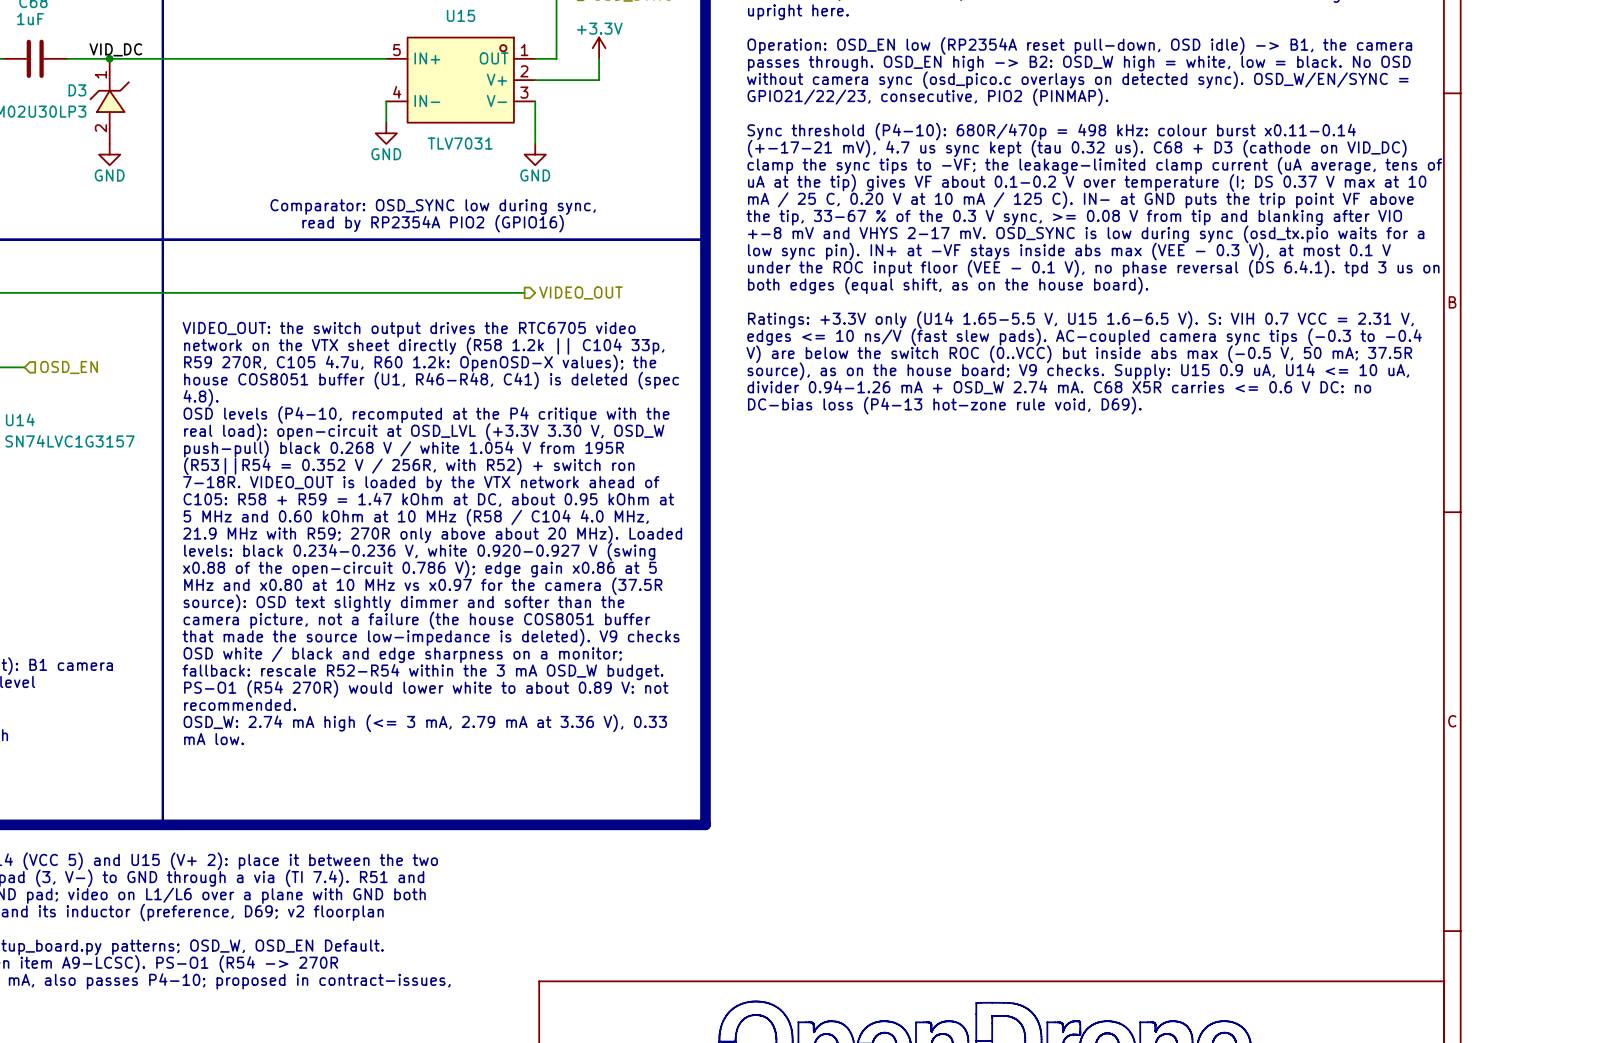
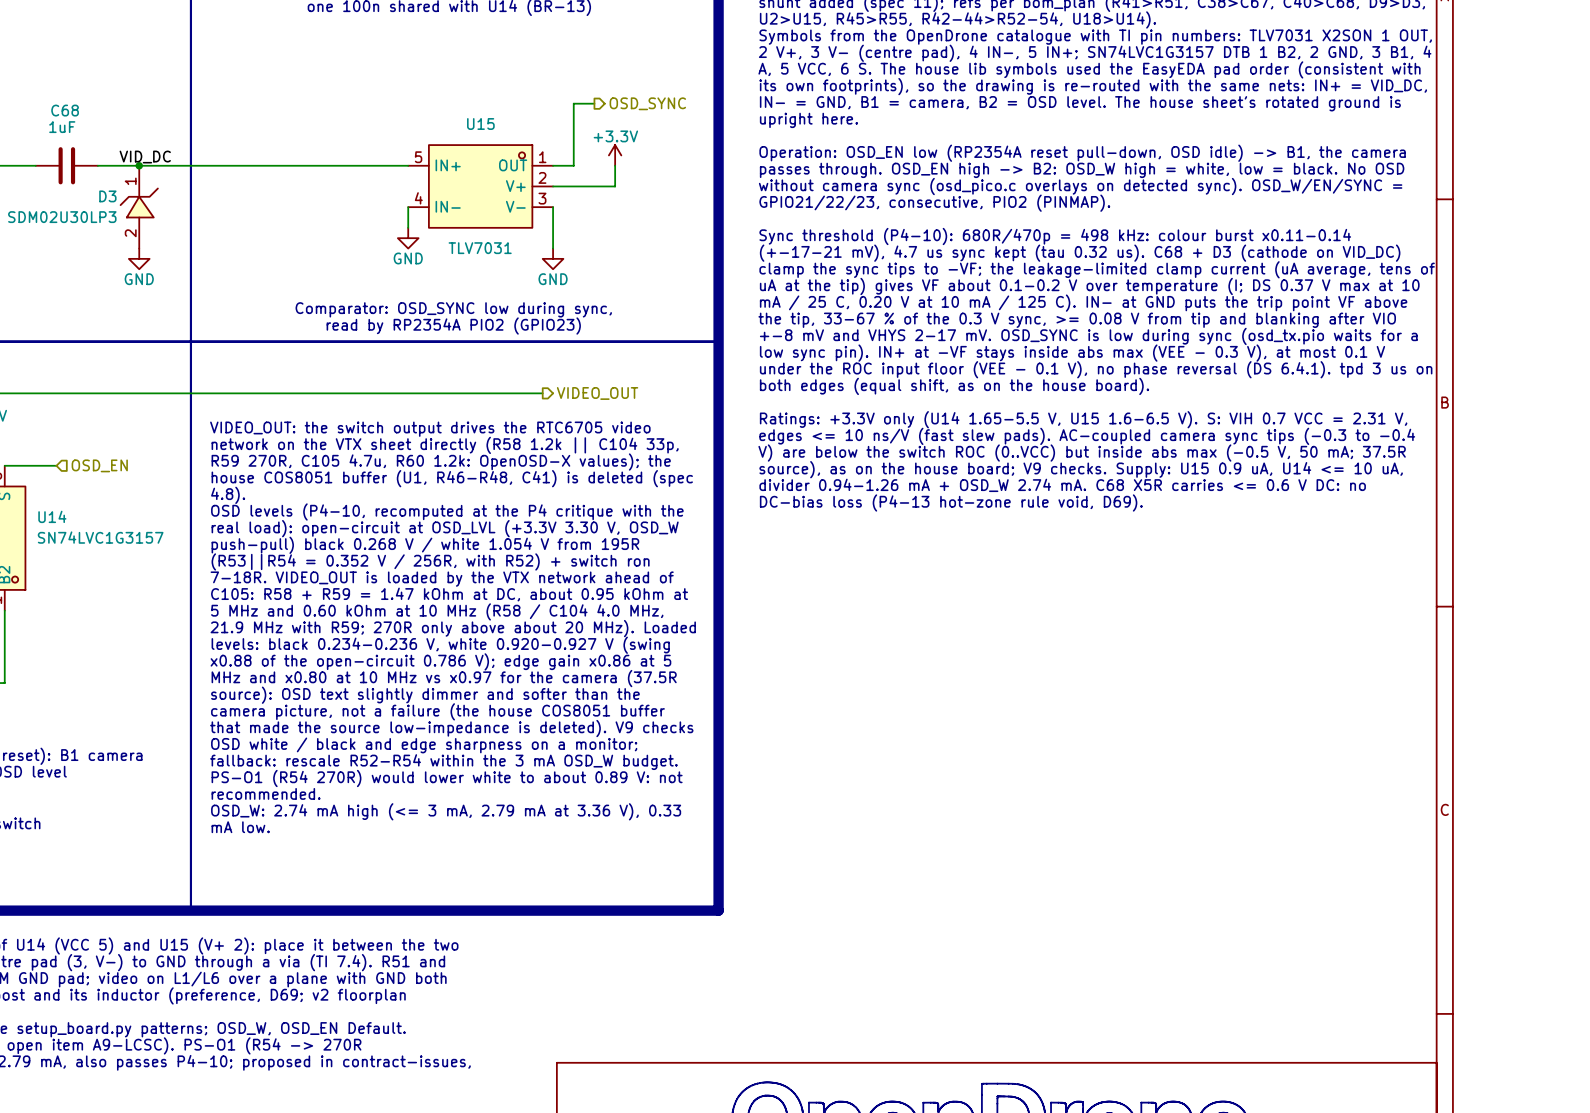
text: read by RP2354A PIO2 (GPIO16) (433, 223) -> read by RP2354A PIO2 (GPIO23) (453, 326)

